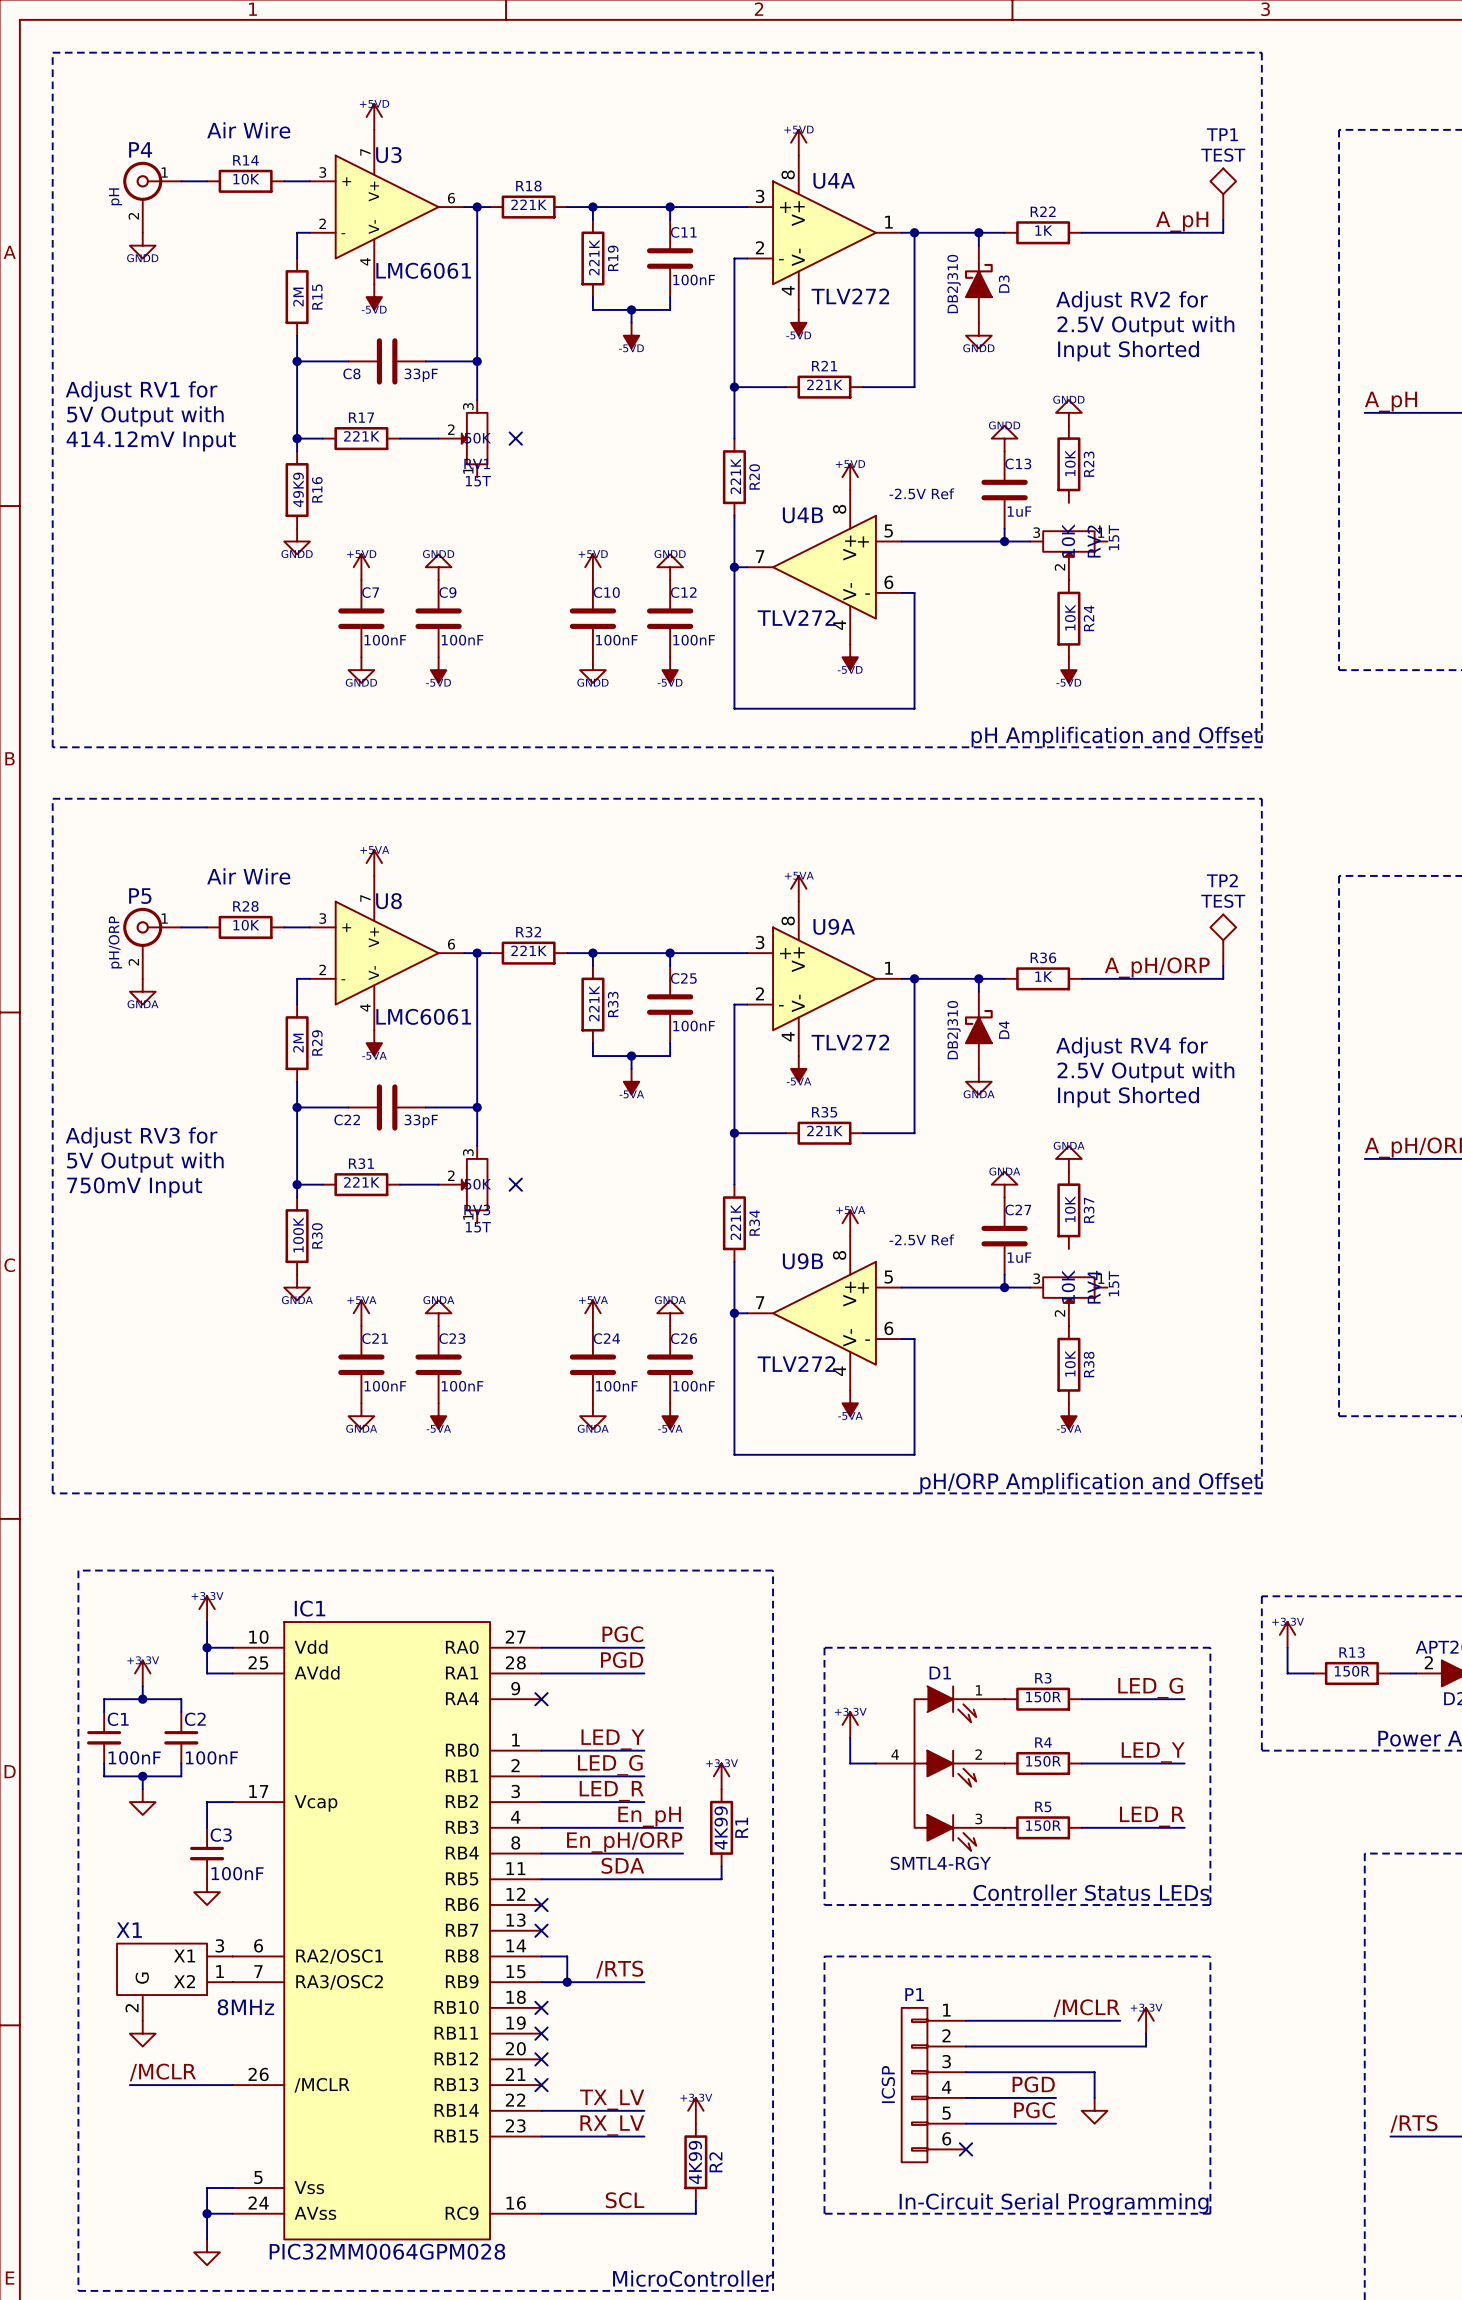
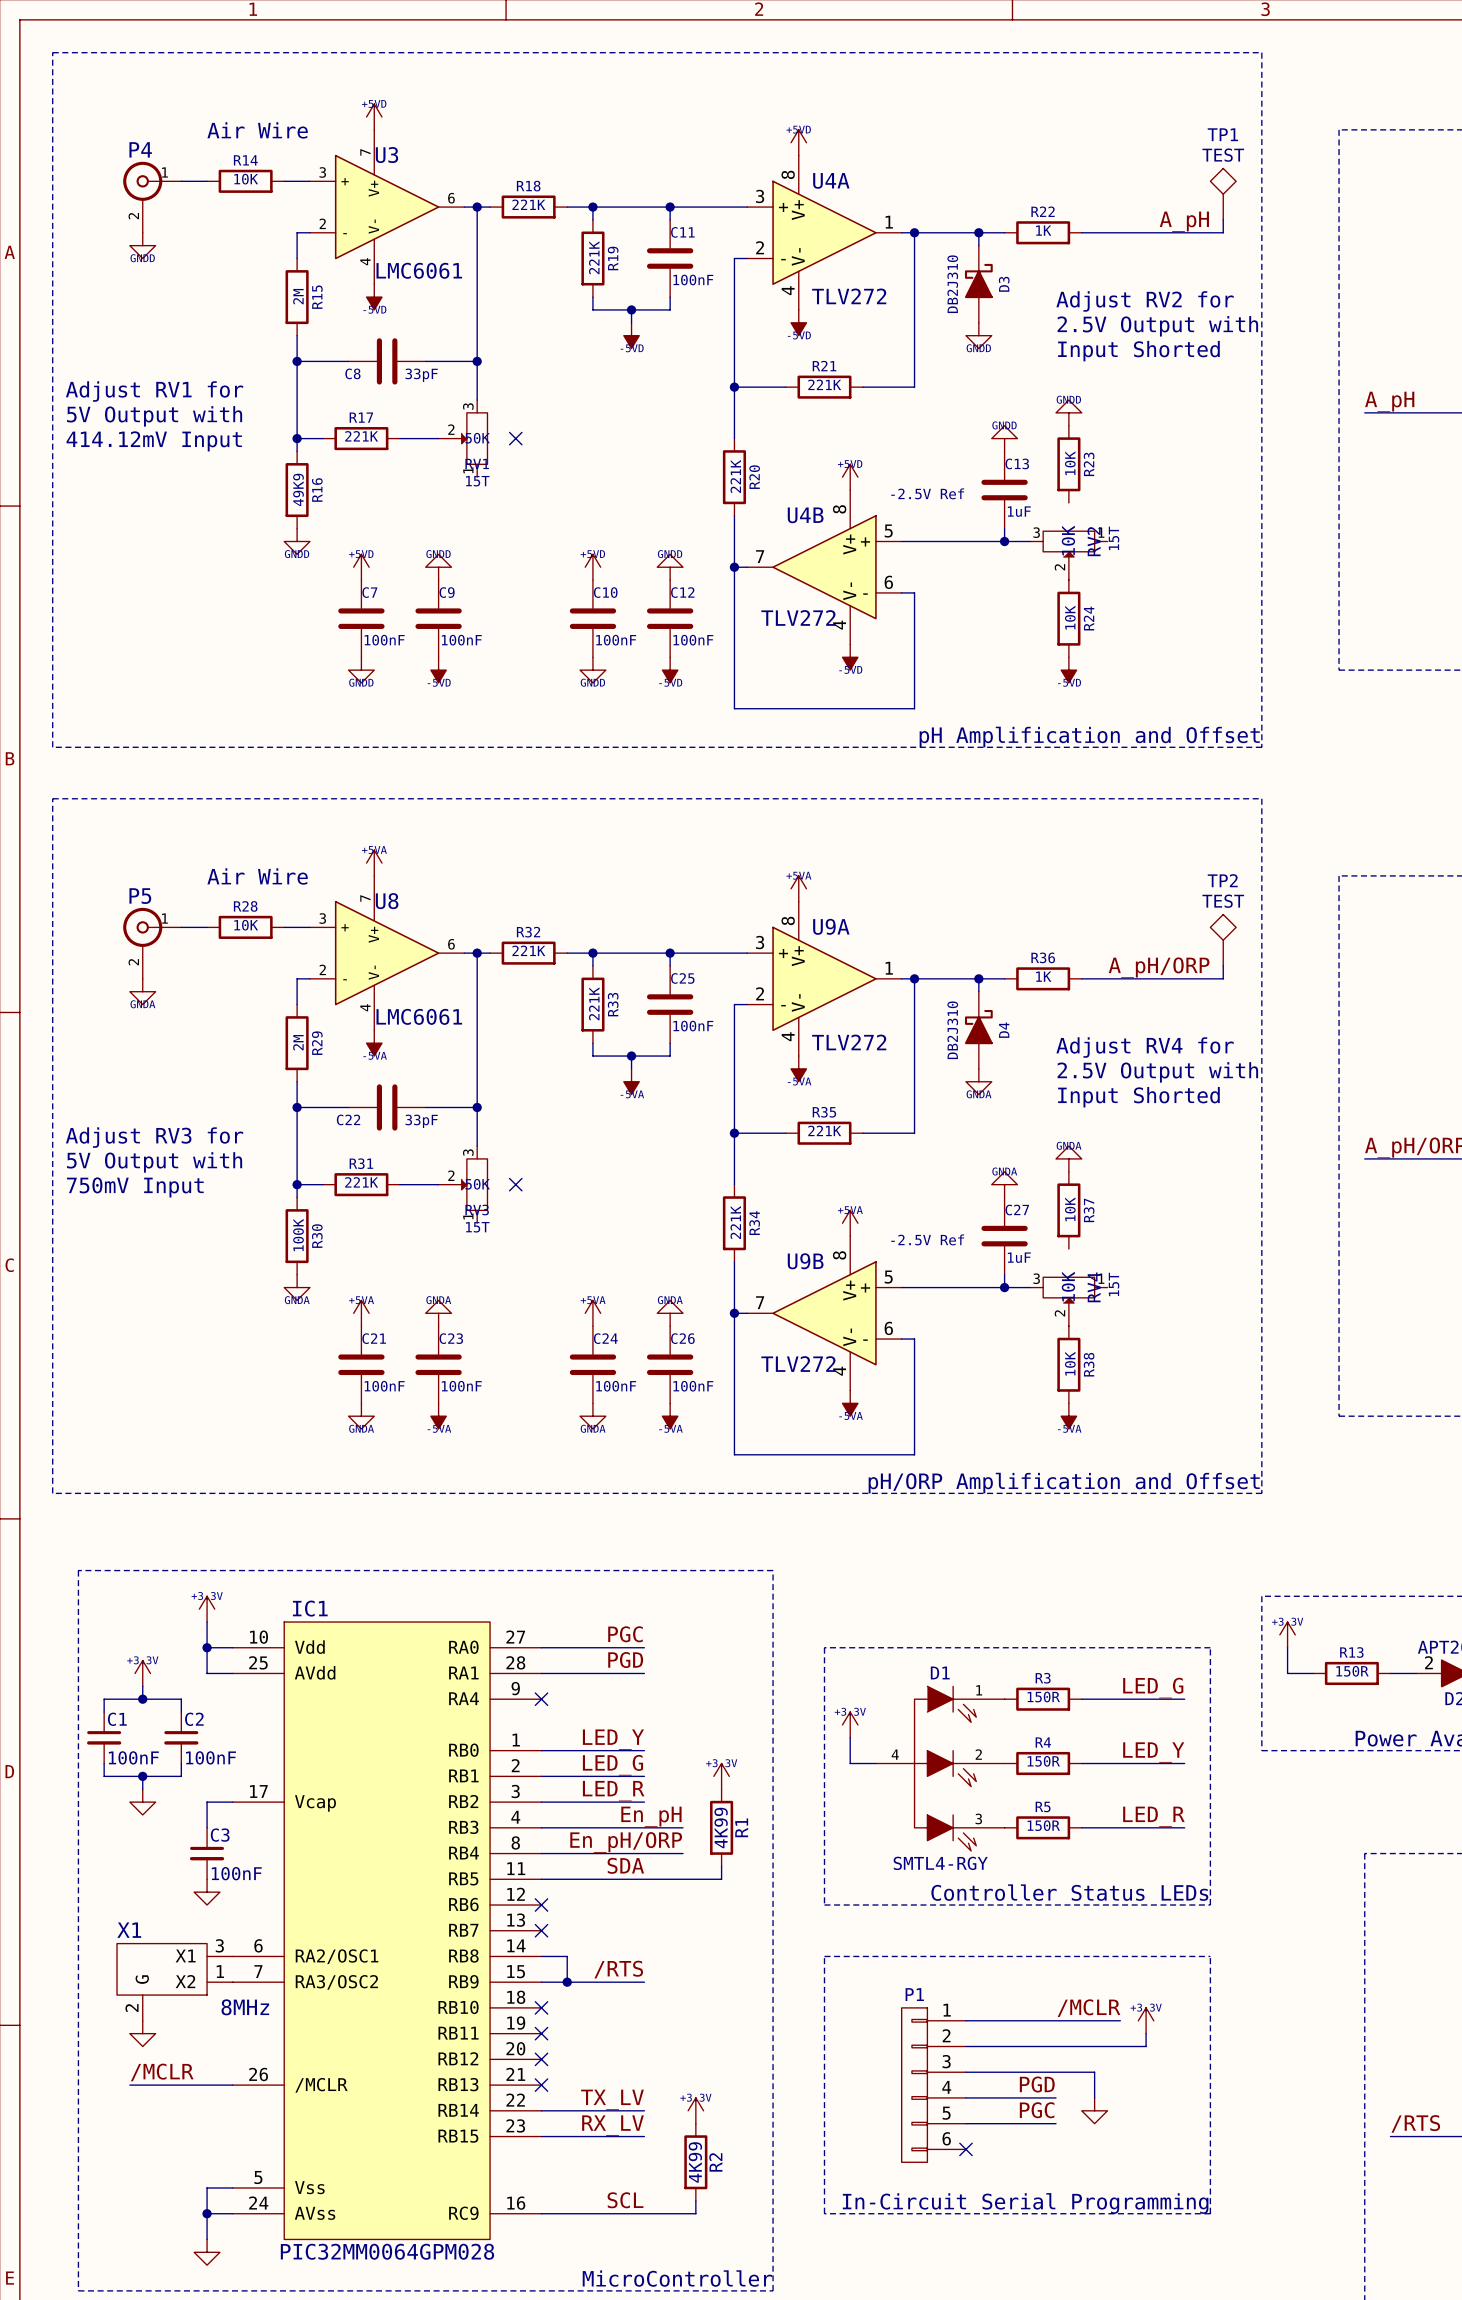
P4 value: pH (115, 196) -> none
P5 value: pH/ORP (115, 942) -> none
P1 value: ICSP (888, 2084) -> none

